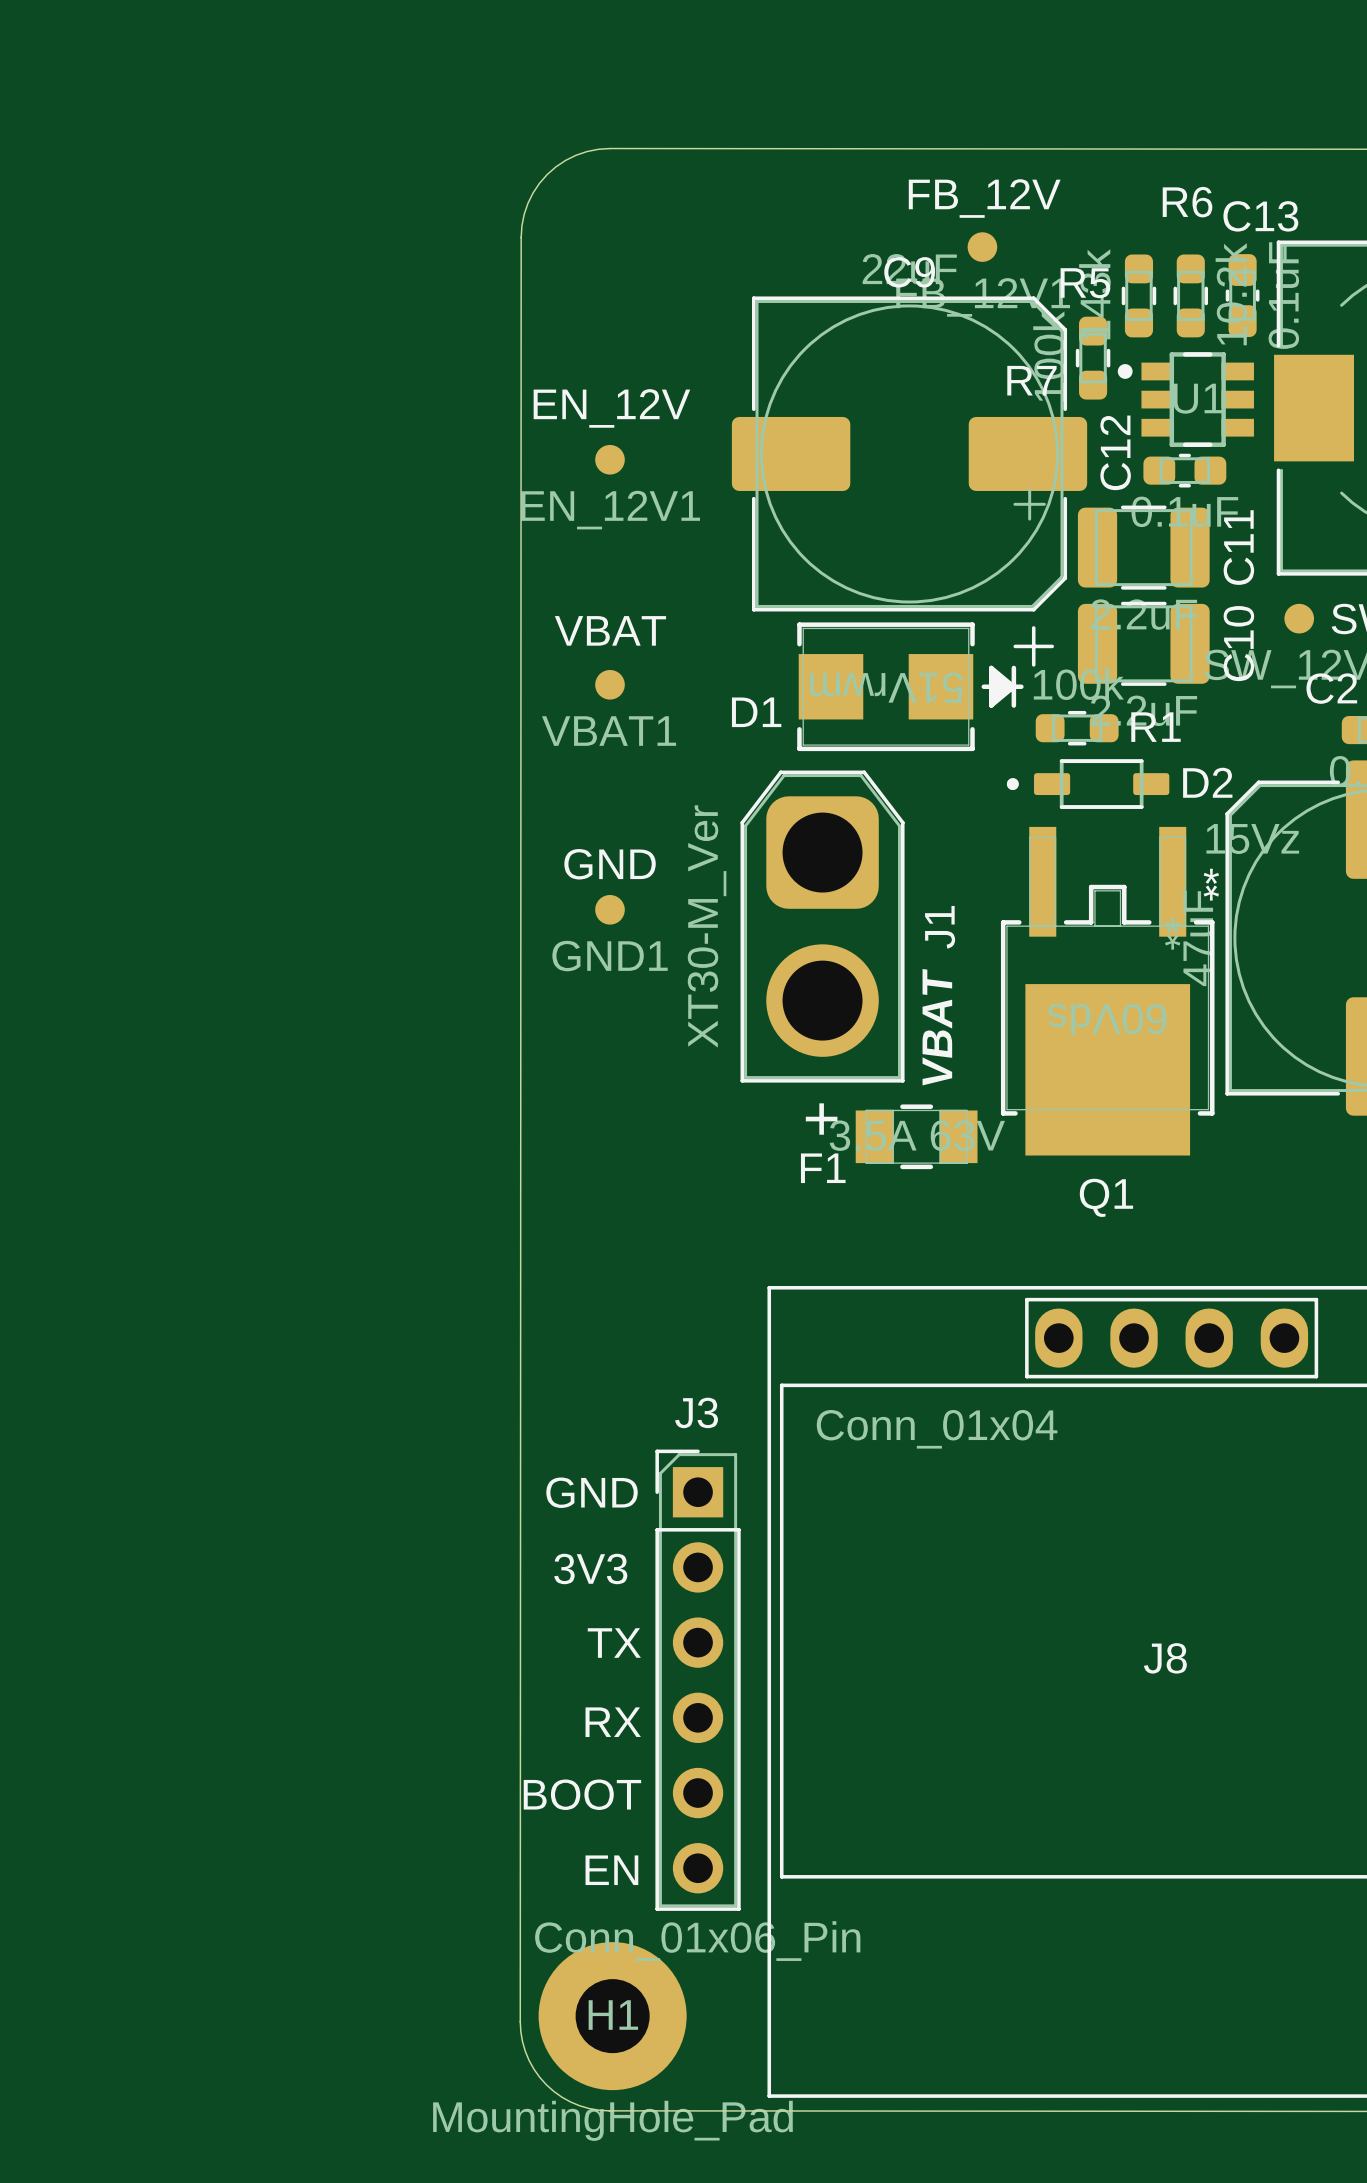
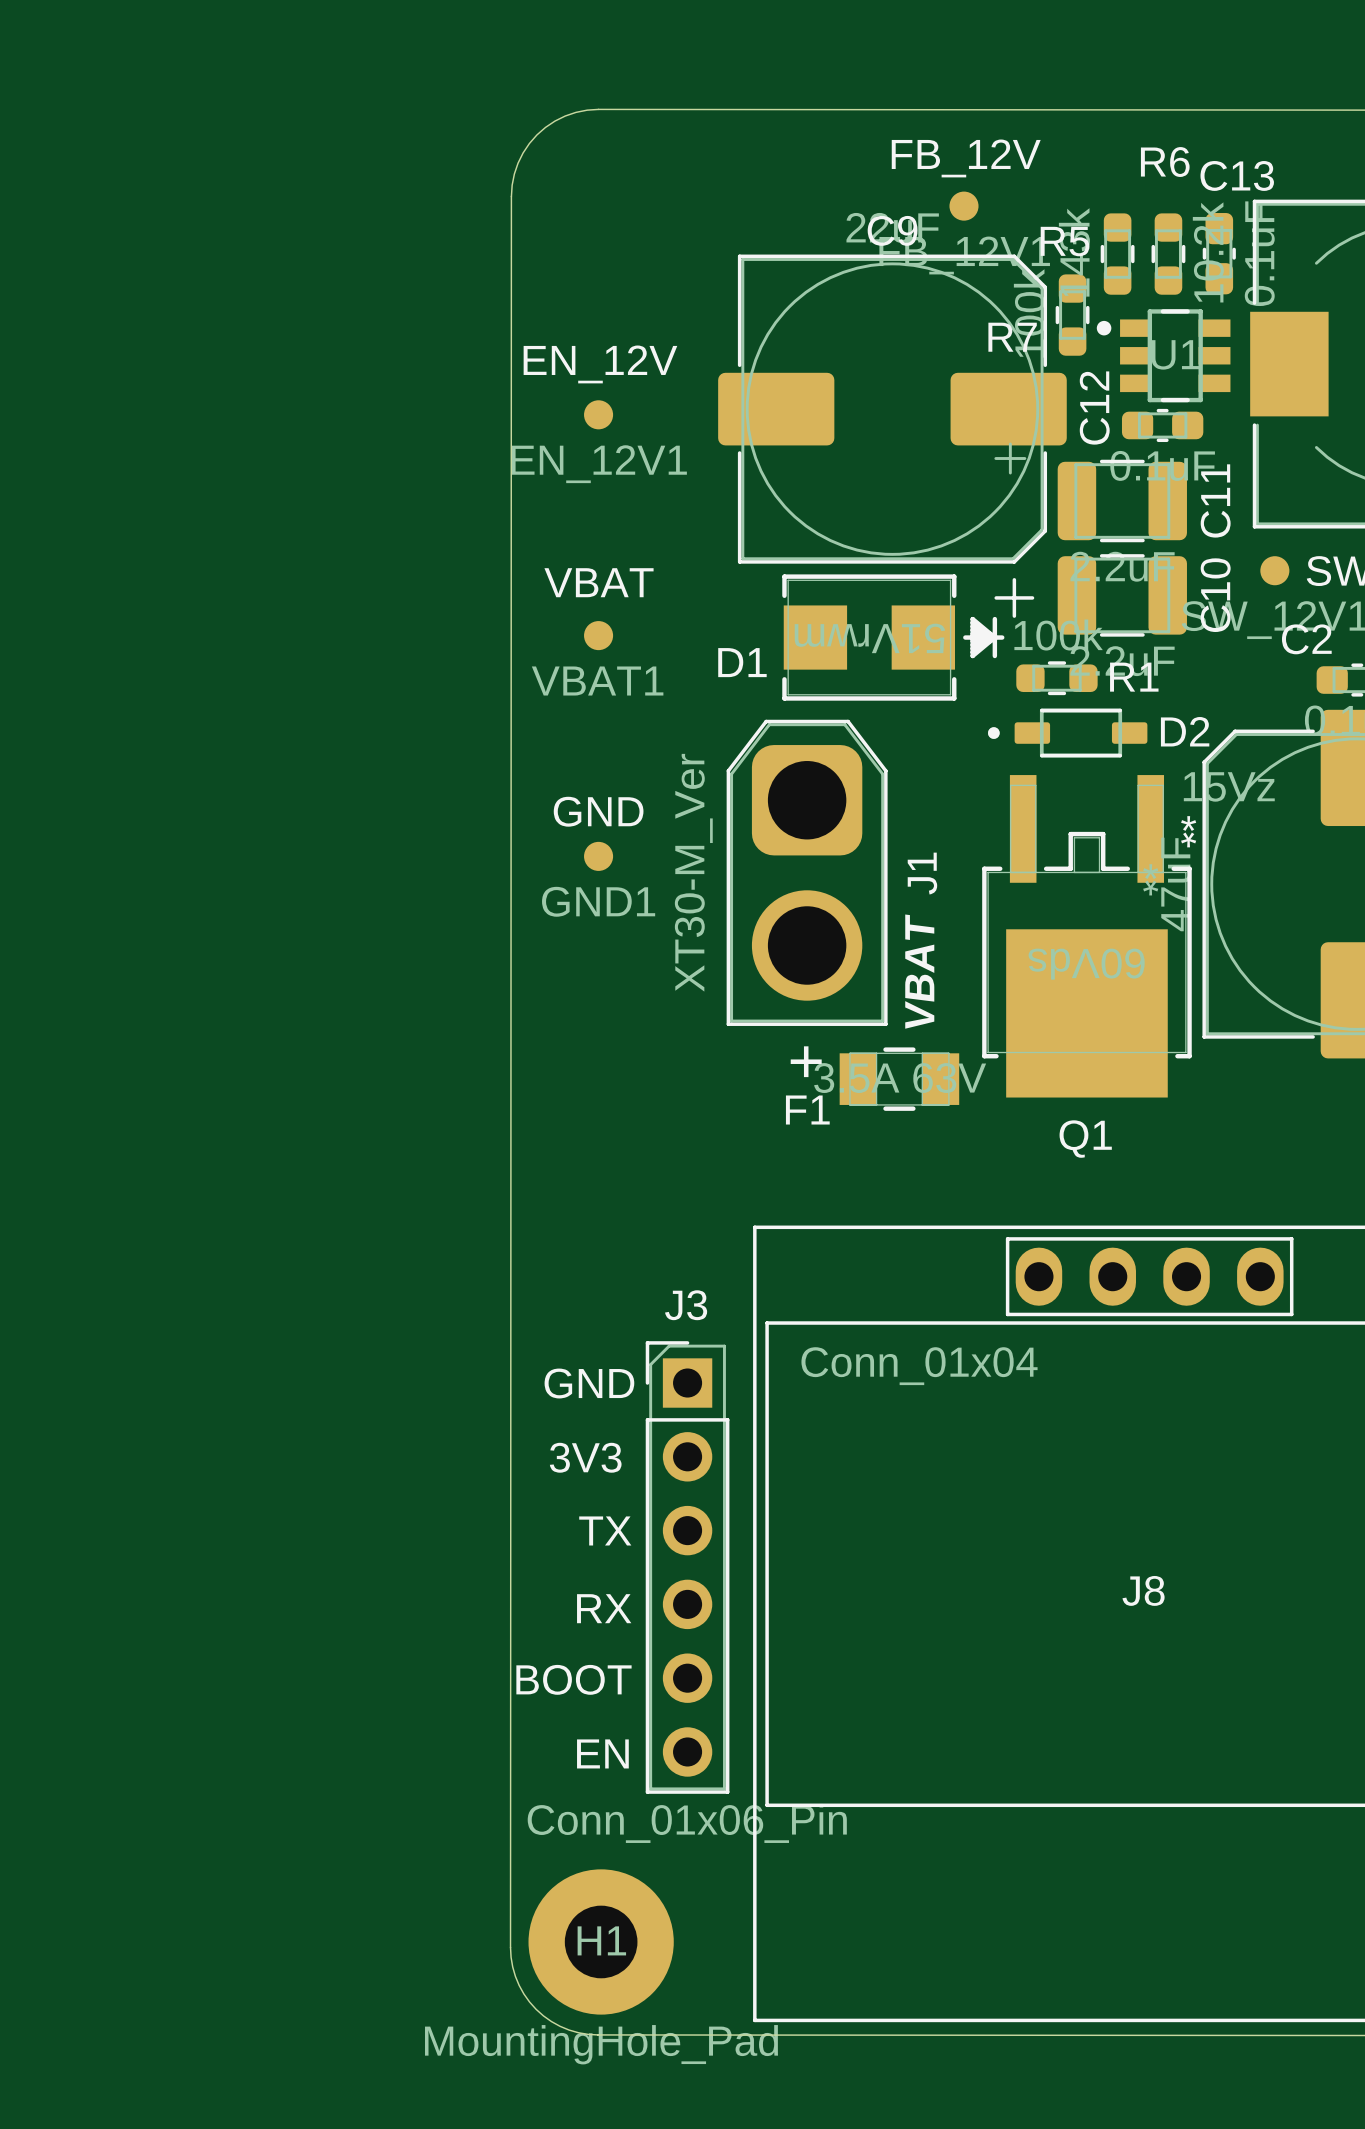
text position: GND (592, 1492) -> GND (589, 1383)
text position: 3V3 (590, 1568) -> 3V3 (585, 1457)
text position: TX (614, 1643) -> TX (605, 1530)
J3 position: (698, 1680) -> (687, 1567)
text position: RX (613, 1722) -> RX (604, 1608)
text position: BOOT (582, 1794) -> BOOT (573, 1679)
text position: EN (611, 1870) -> EN (602, 1753)

